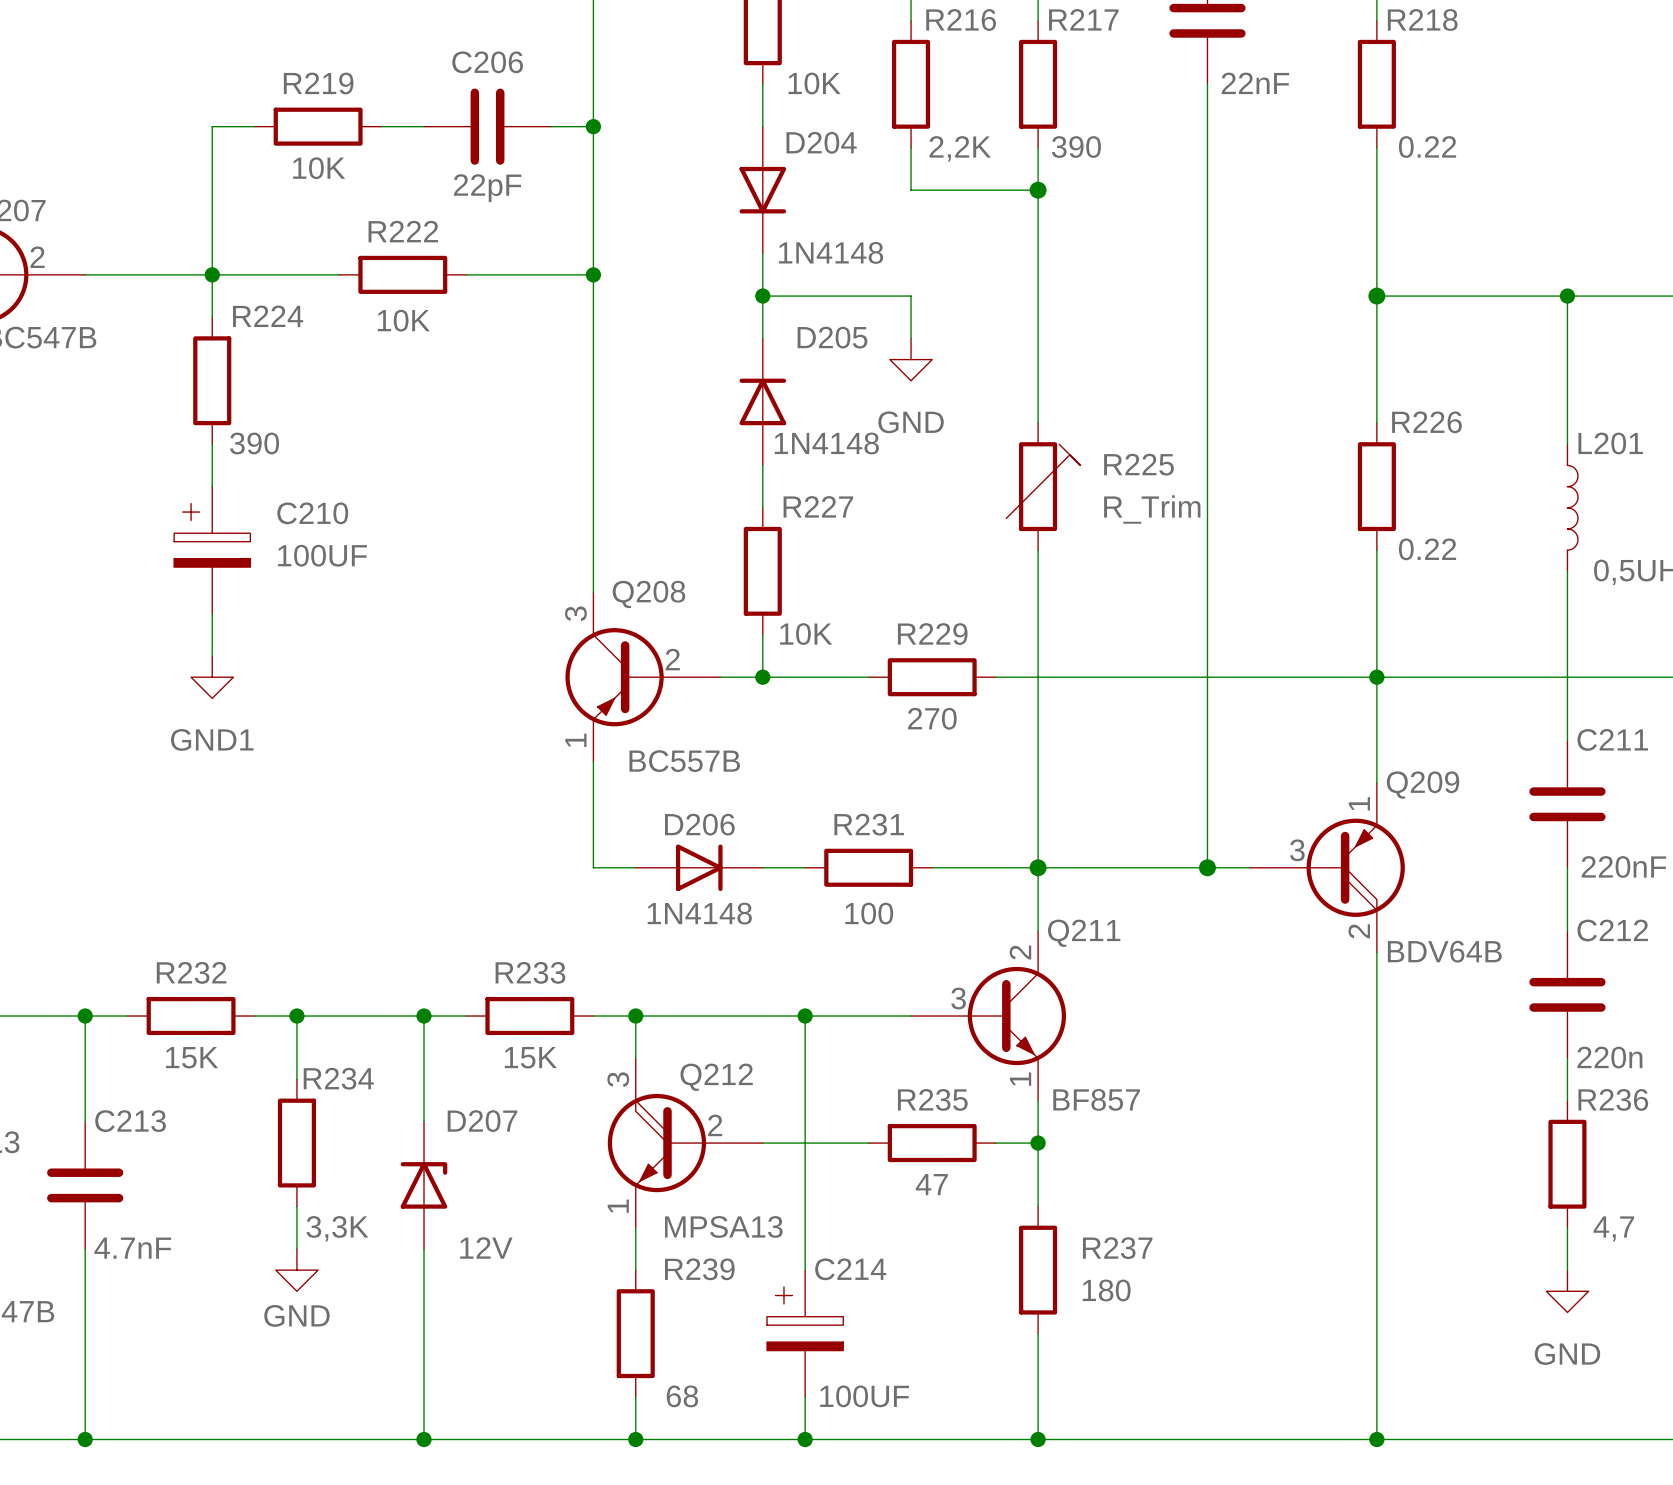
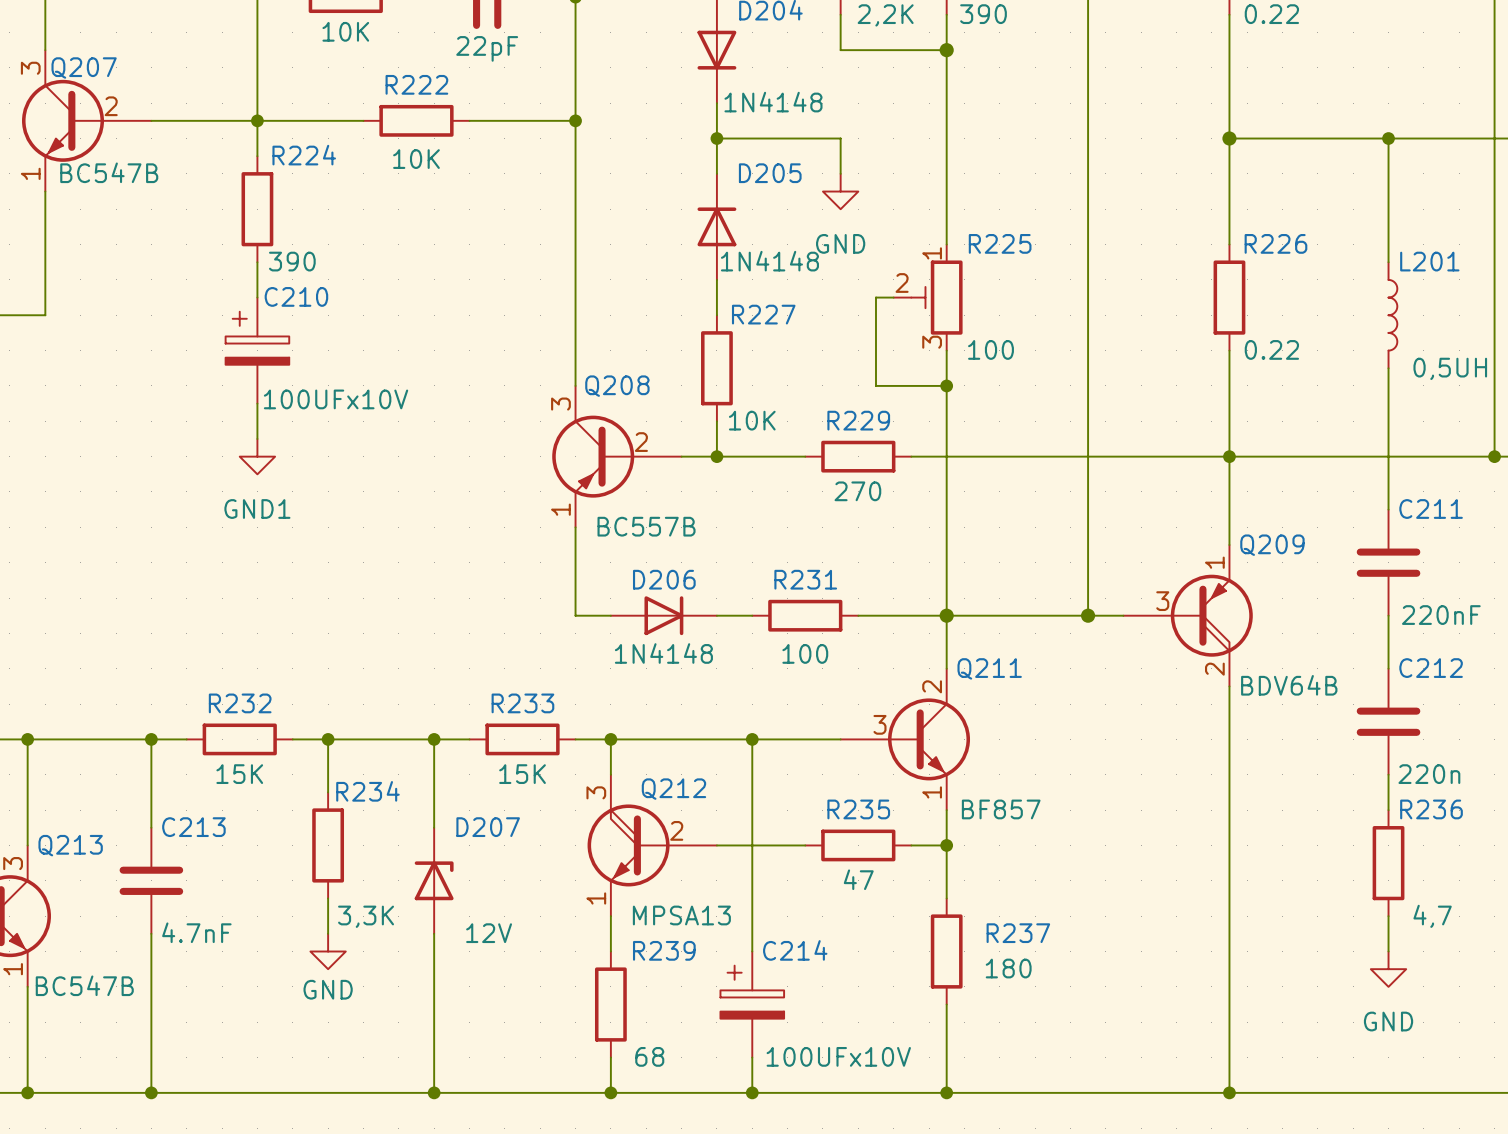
R225 symbol: [1006, 423, 1081, 551] -> [893, 244, 963, 351]
R225 name position: R225 (1139, 464) -> R225 (1000, 243)
wire: none -> (893, 297) (875, 297) (875, 385) (946, 385)
R225 value: R_Trim (1152, 509) -> 100 (991, 349)
C210 name position: C210 (312, 513) -> C210 (296, 296)
C210 value: 100UF (322, 555) -> 100UFx10V (336, 399)
junction: none -> (946, 385)
C214 value: 100UF (864, 1396) -> 100UFx10V (838, 1056)

